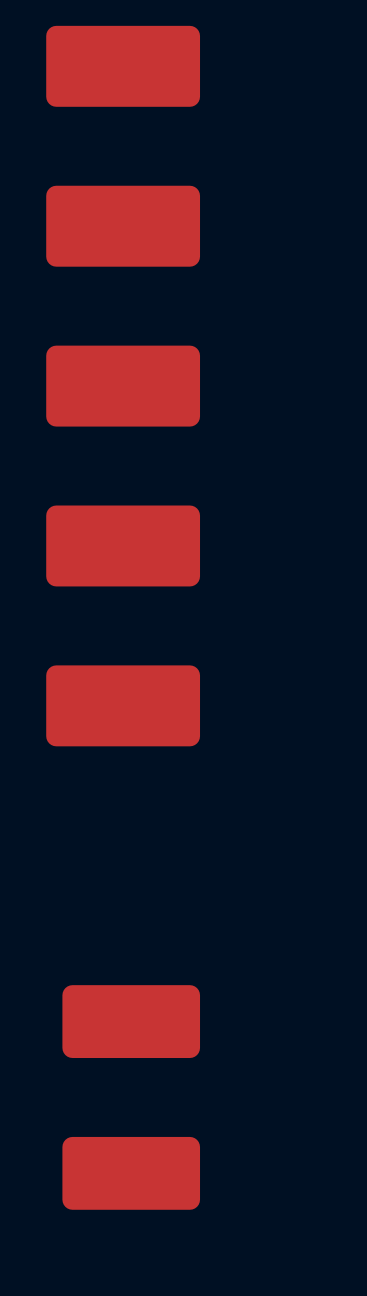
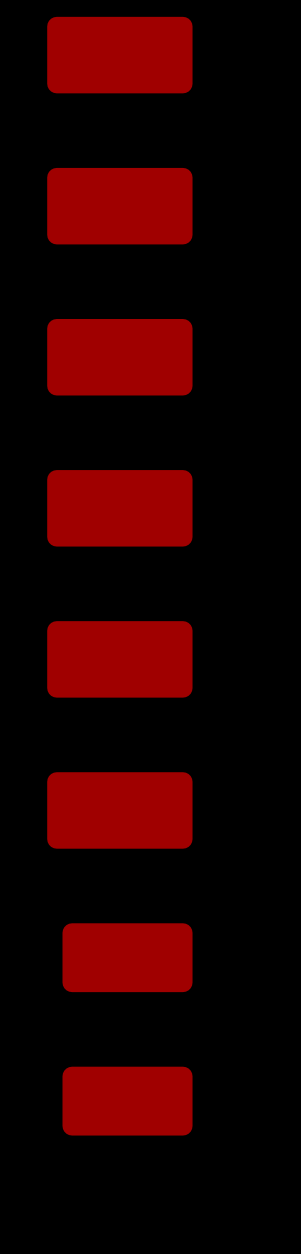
part: none -> (119, 810)

